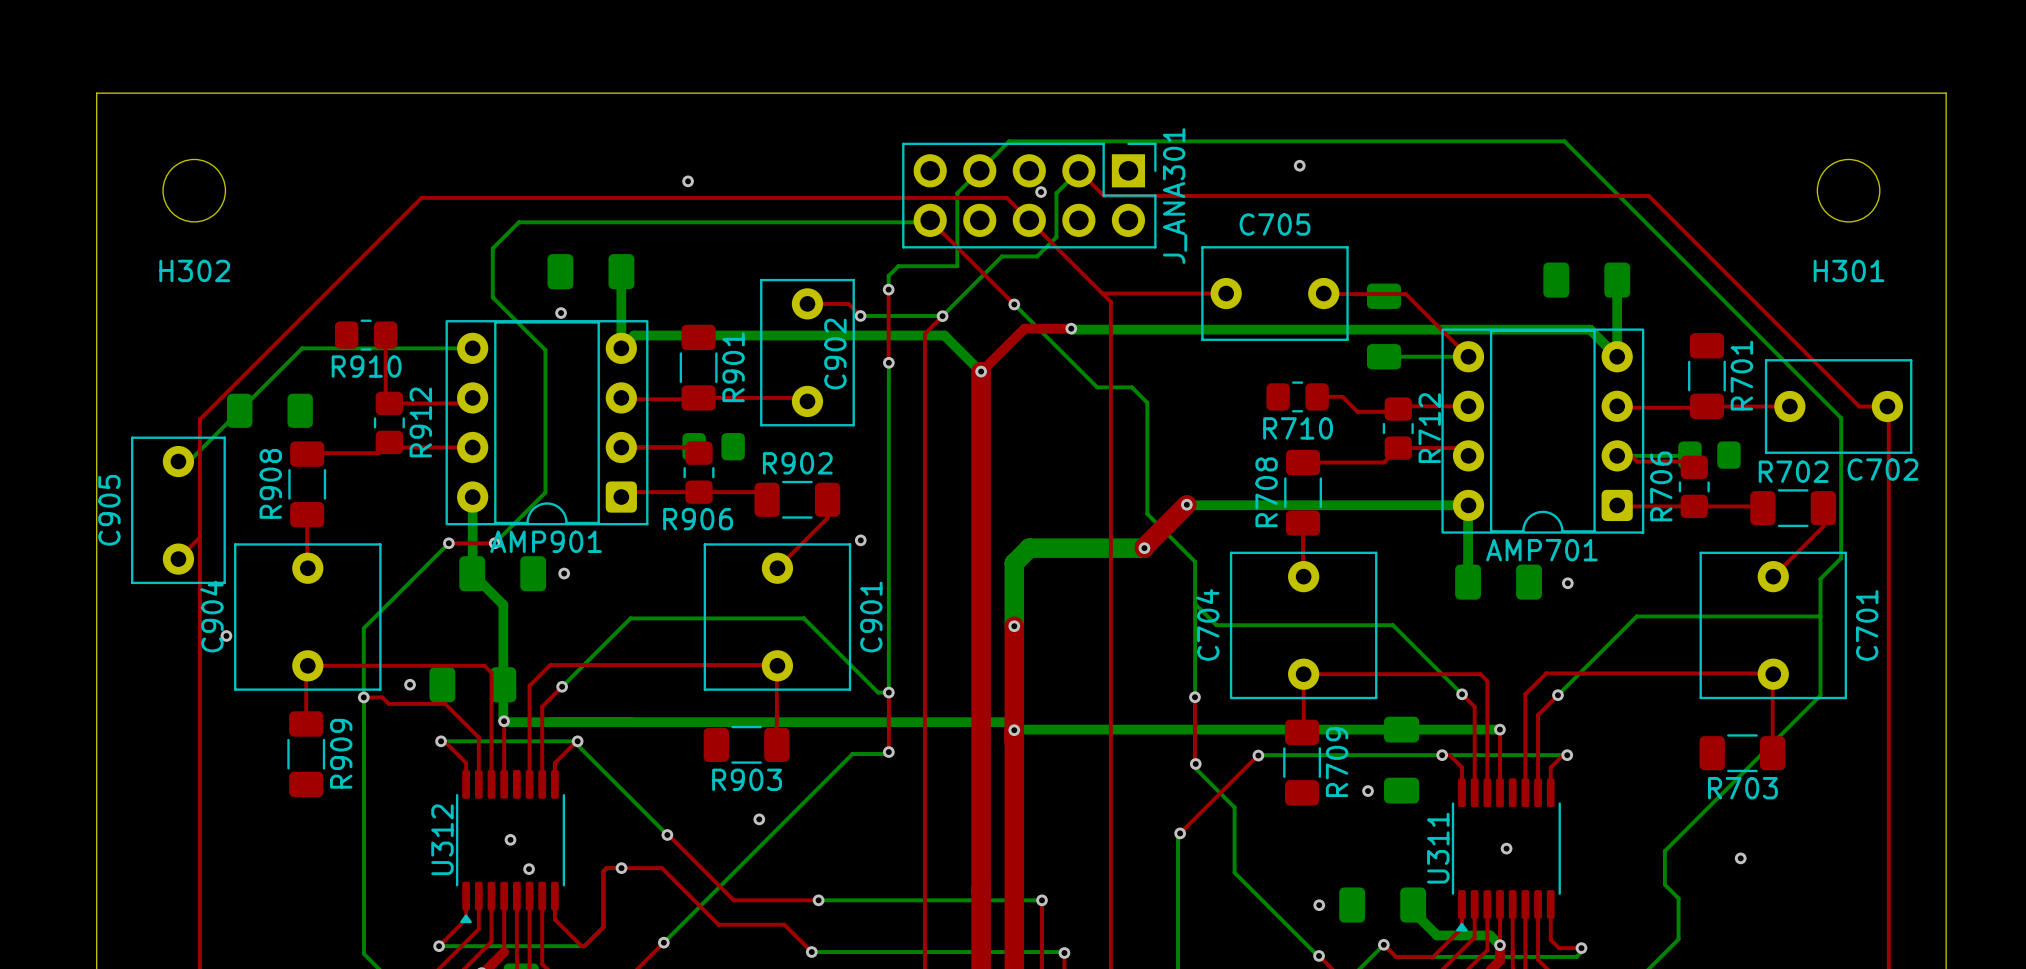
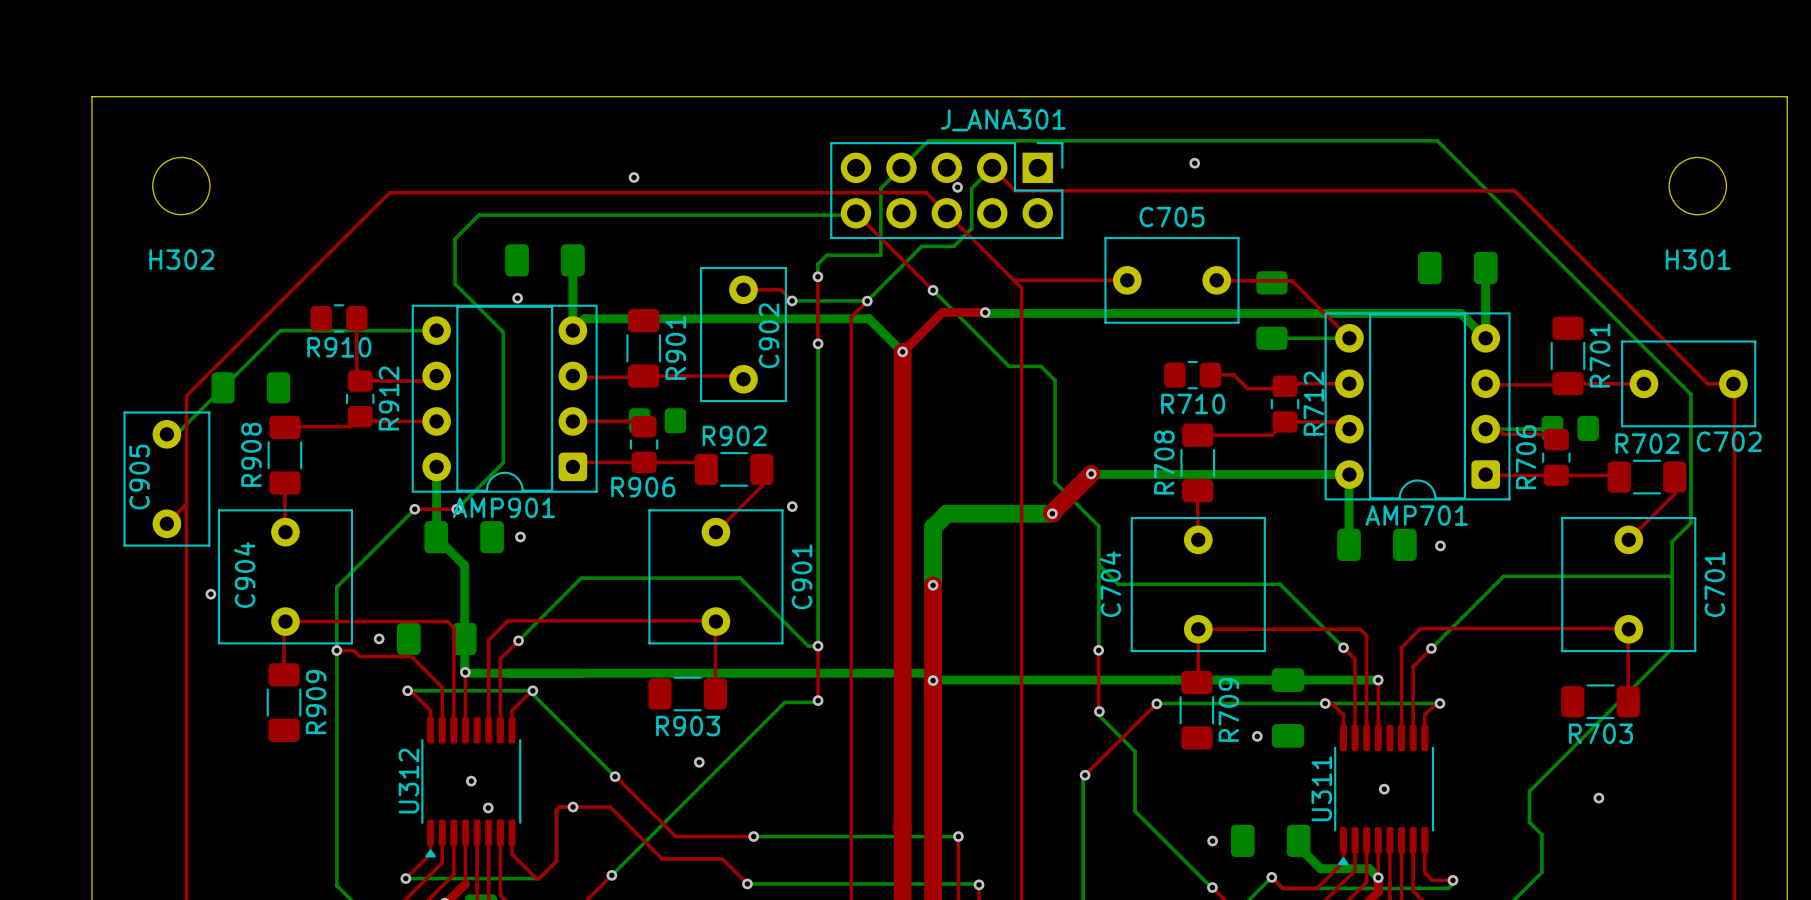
J_ANA301 name rotation: 0° (1175, 196) -> 90° clockwise (1003, 120)
C905 name position: C905 (109, 510) -> C905 (139, 477)
C904 name position: C904 (211, 616) -> C904 (244, 575)

